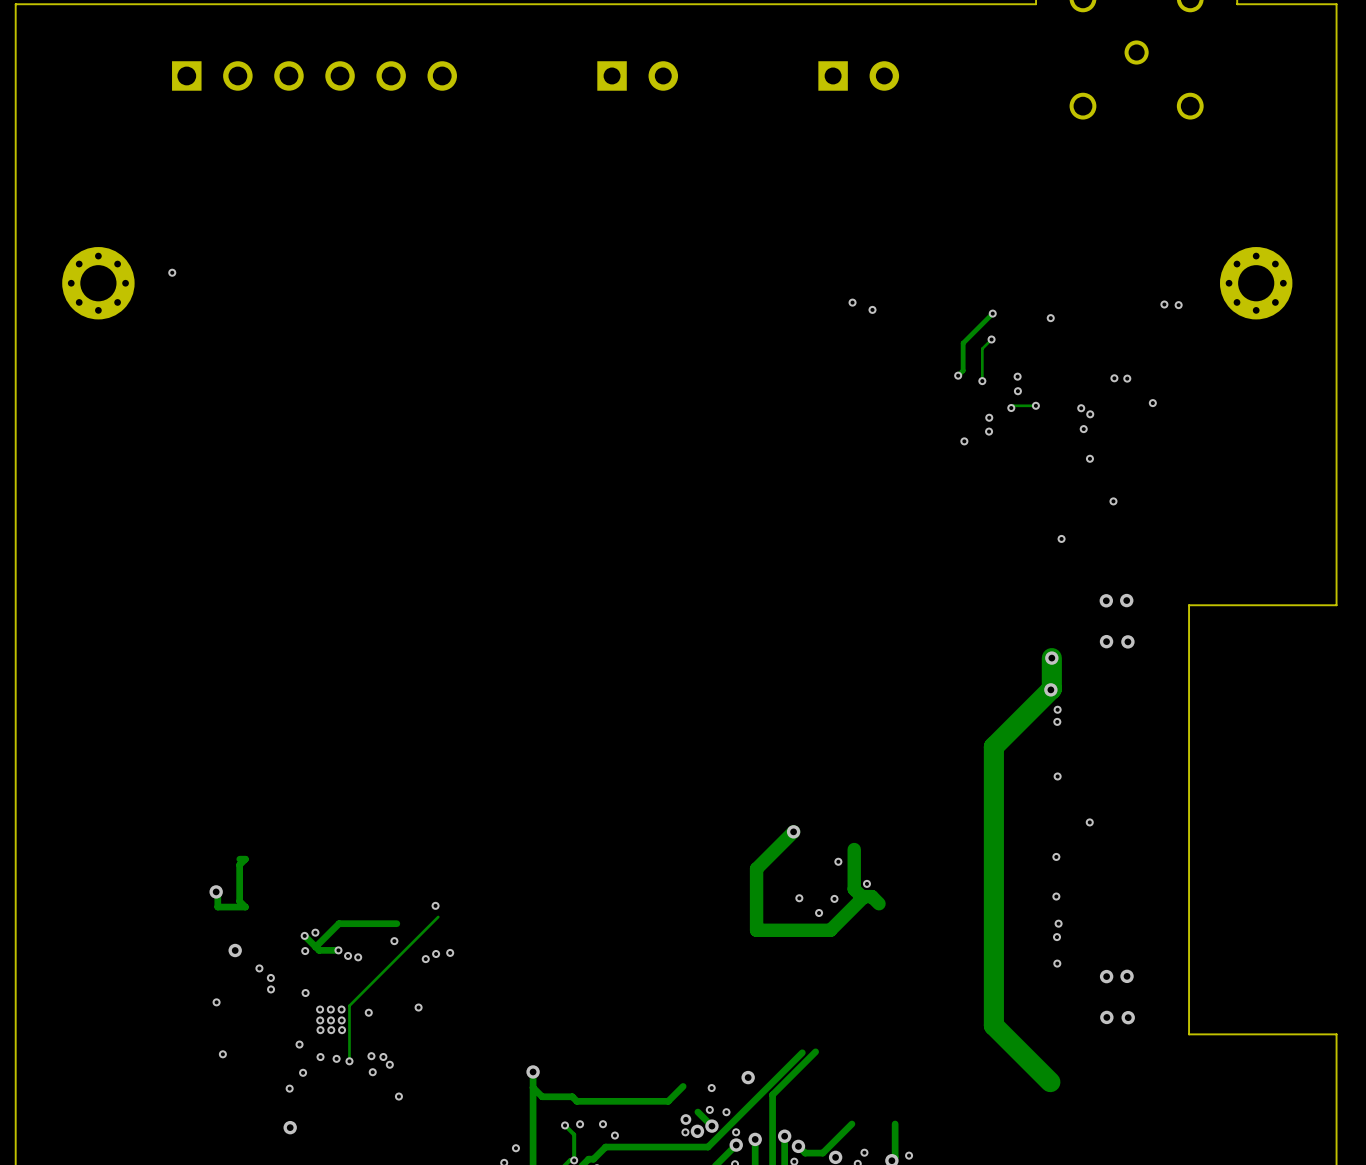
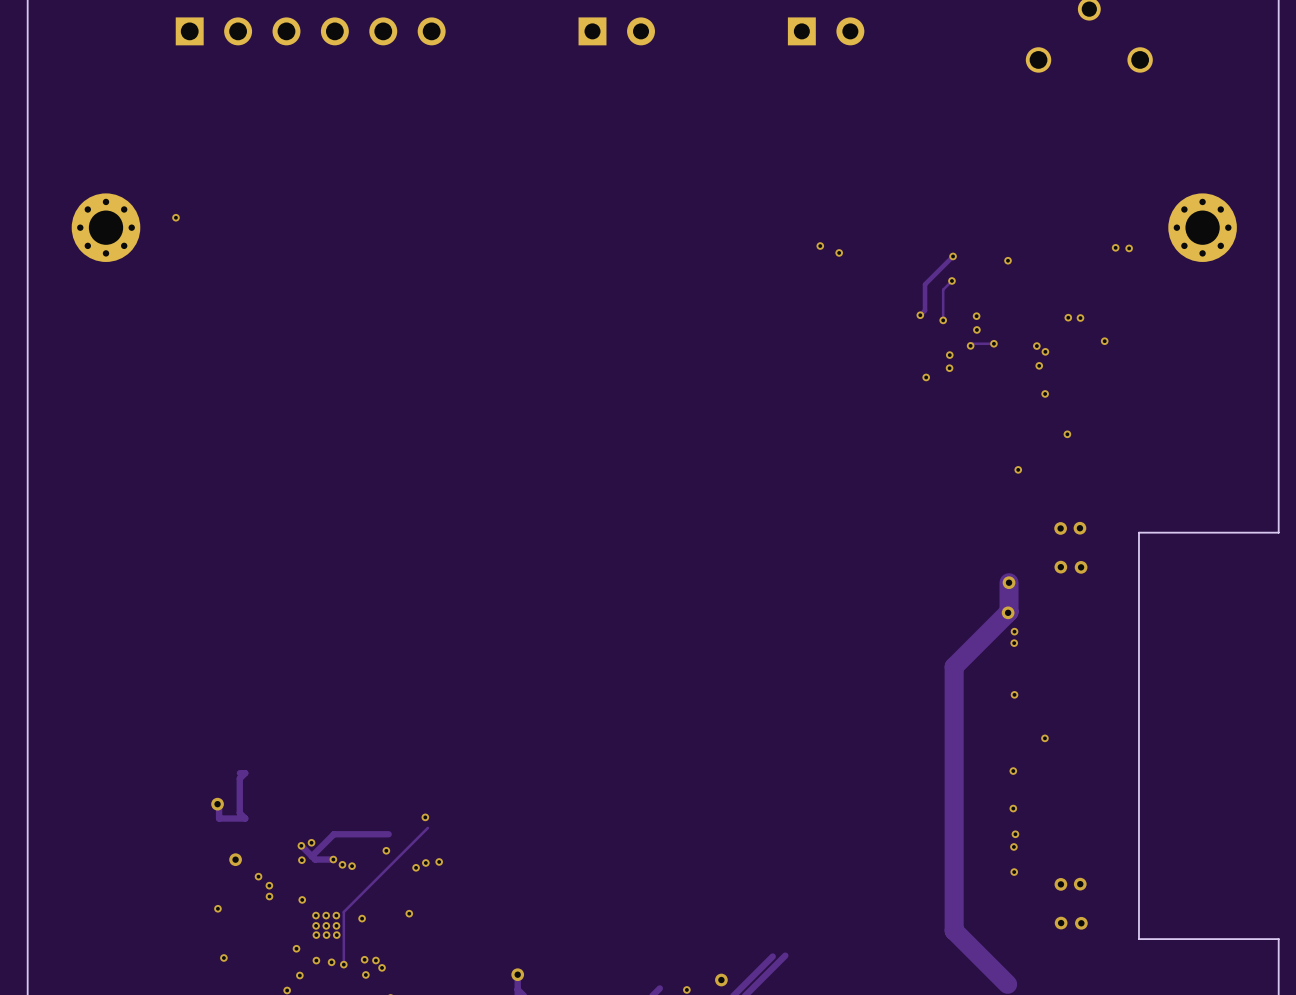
track: (793, 831) (756, 868) (756, 930) (830, 930) (864, 896) -> none
via: (793, 831) -> none
track: (854, 849) (854, 889) (861, 896) (871, 896) (879, 903) -> none
via: (838, 861) -> none
via: (866, 883) -> none
via: (799, 898) -> none
via: (834, 898) -> none
via: (819, 912) -> none

